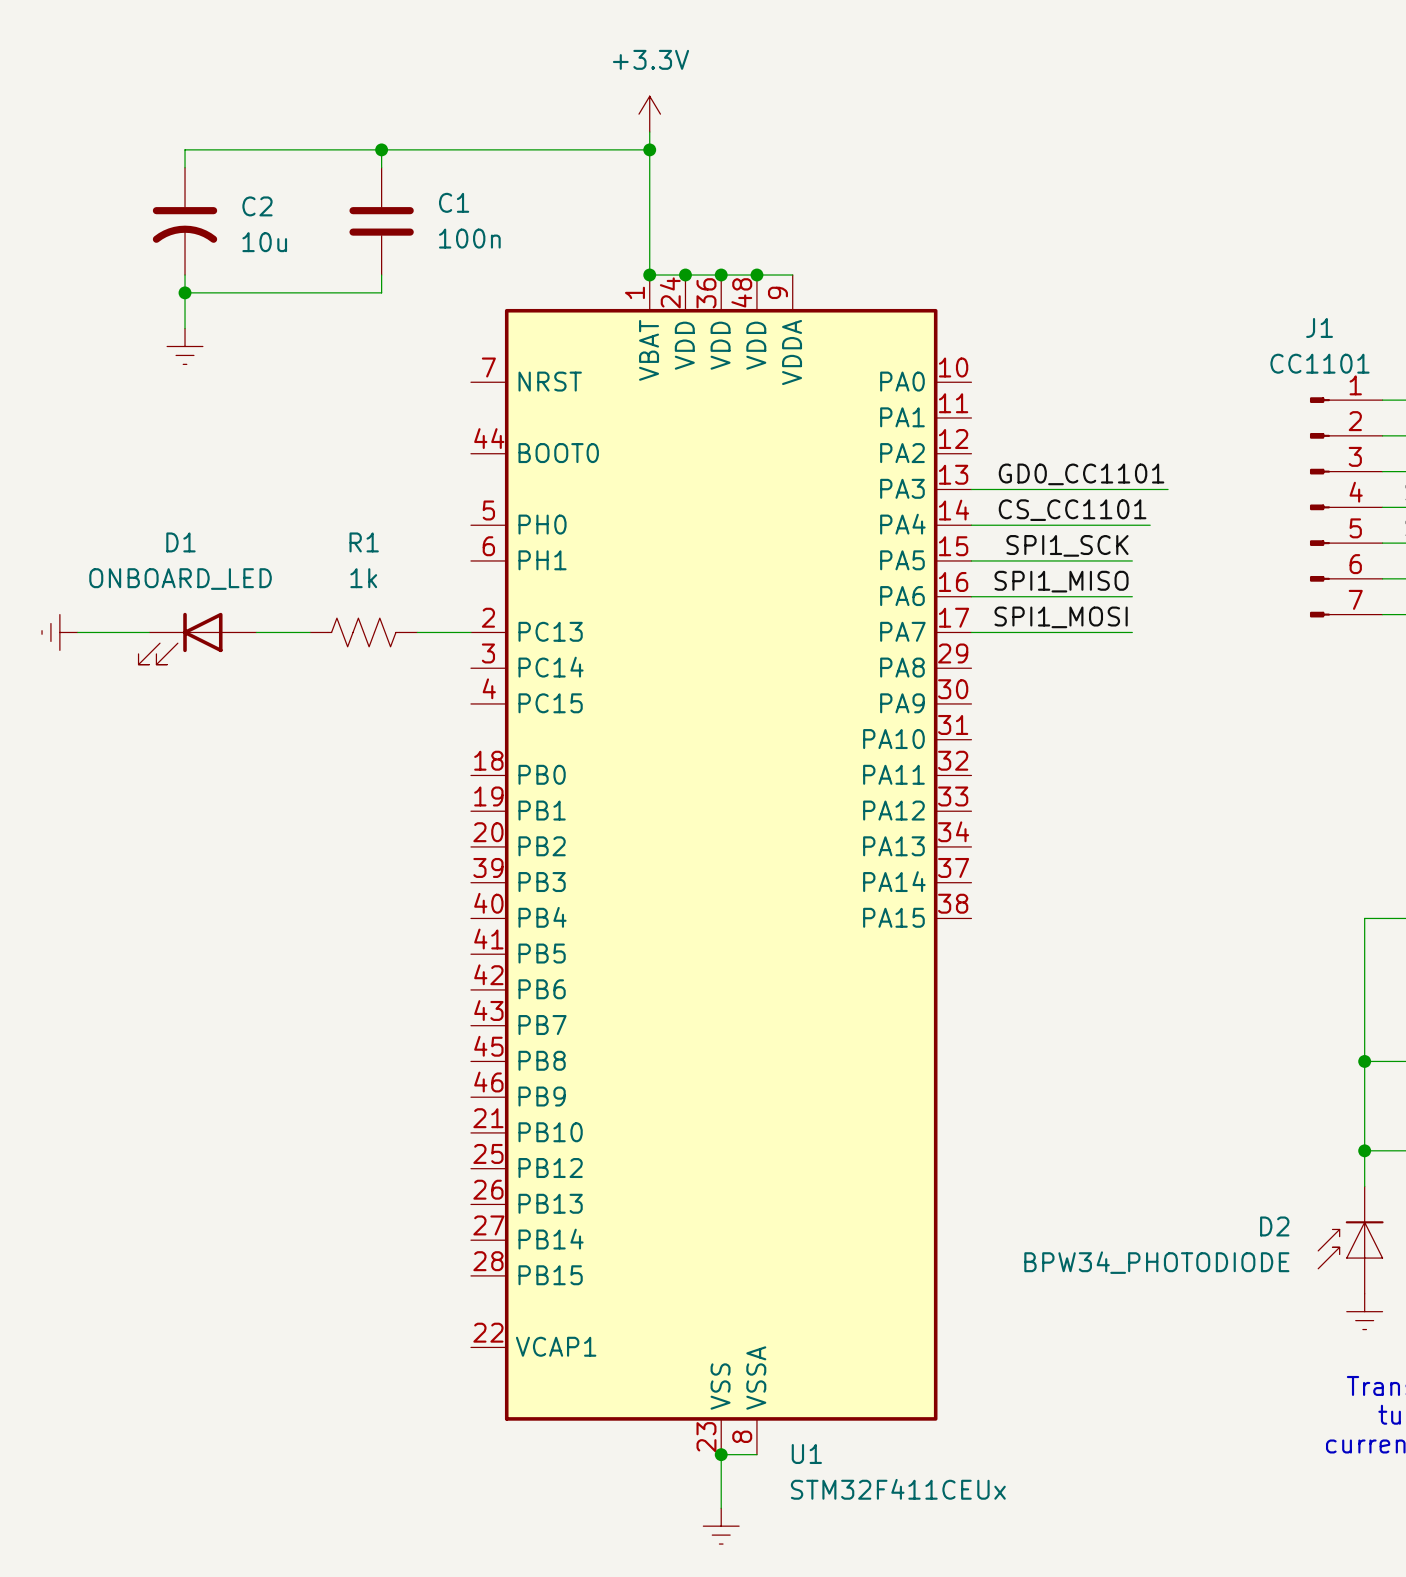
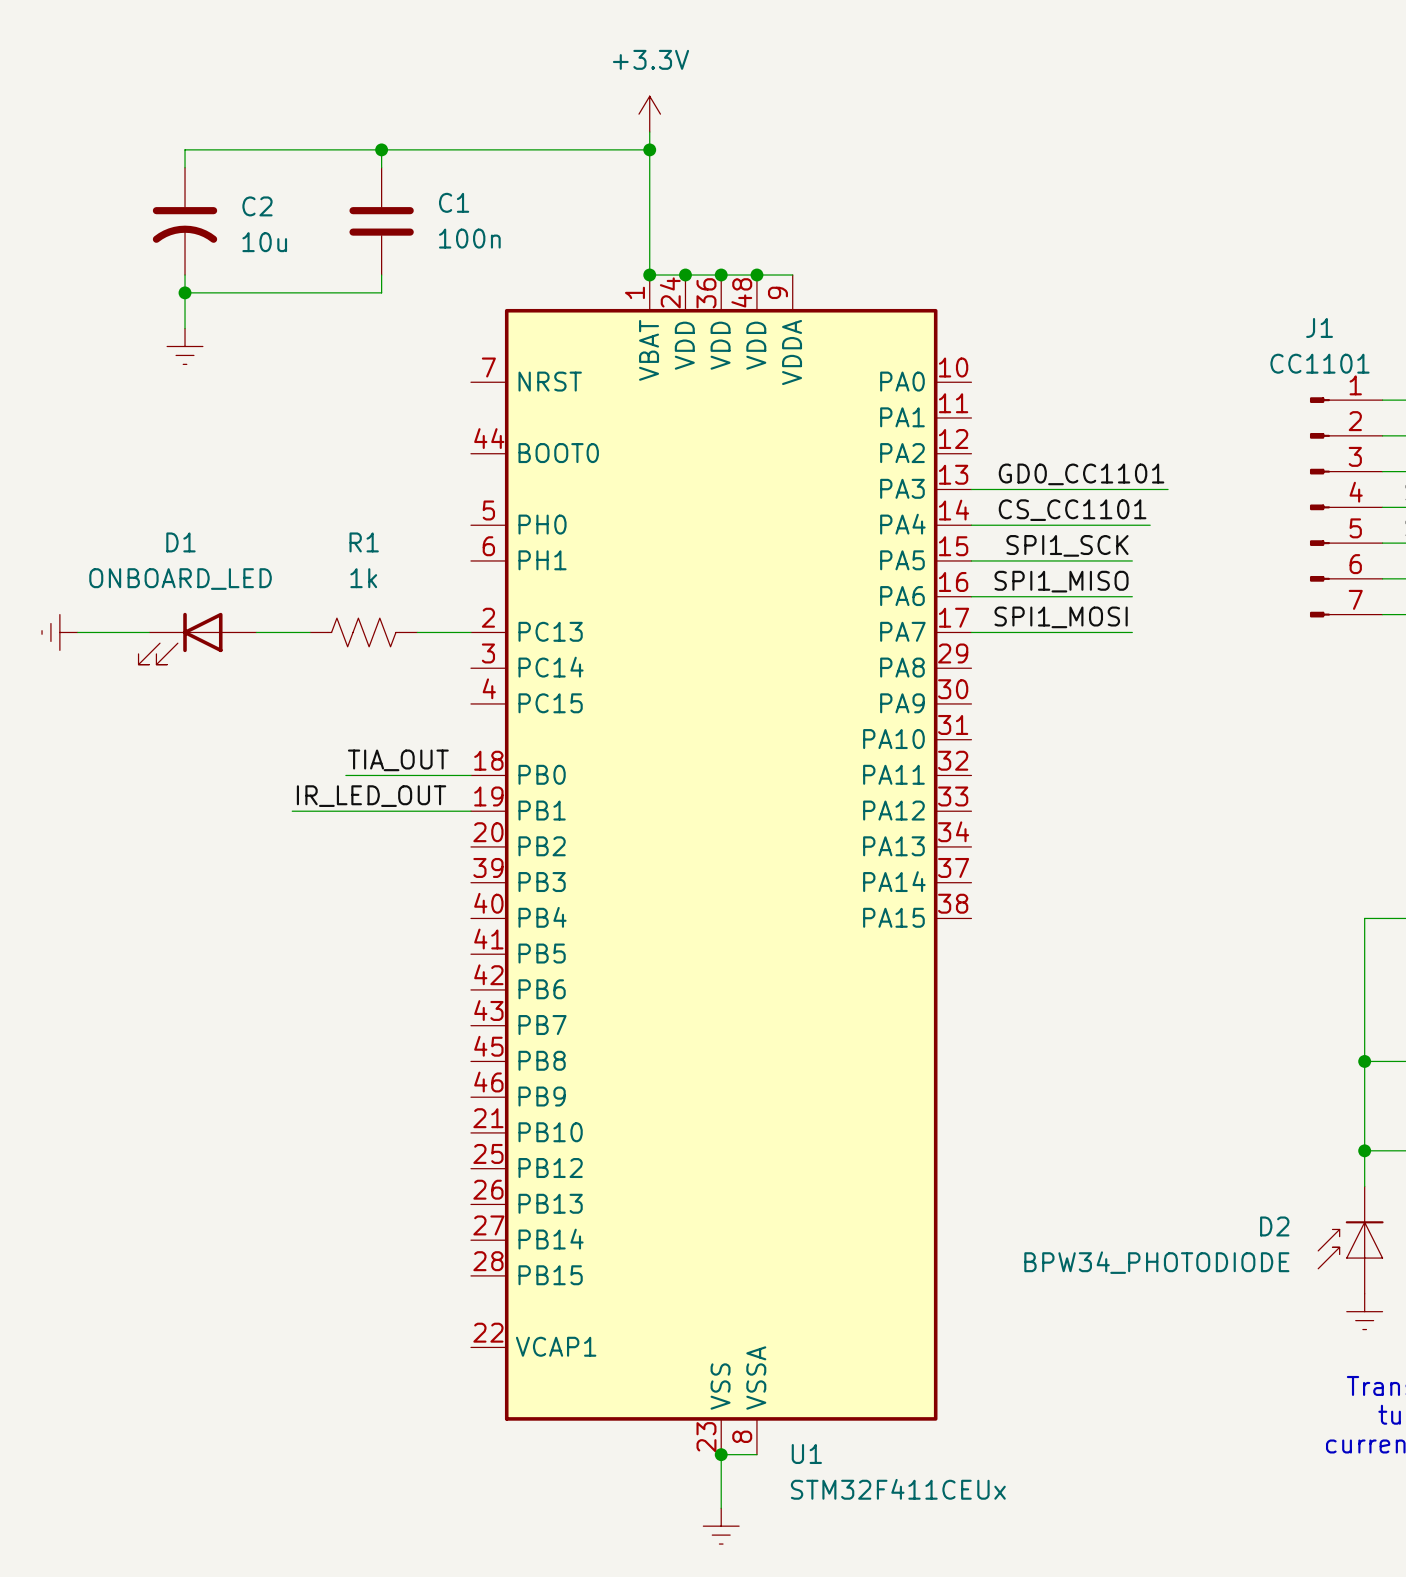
label: none -> TIA_OUT (398, 760)
wire: none -> (345, 775) (470, 775)
label: none -> IR_LED_OUT (371, 796)
wire: none -> (292, 811) (470, 811)

